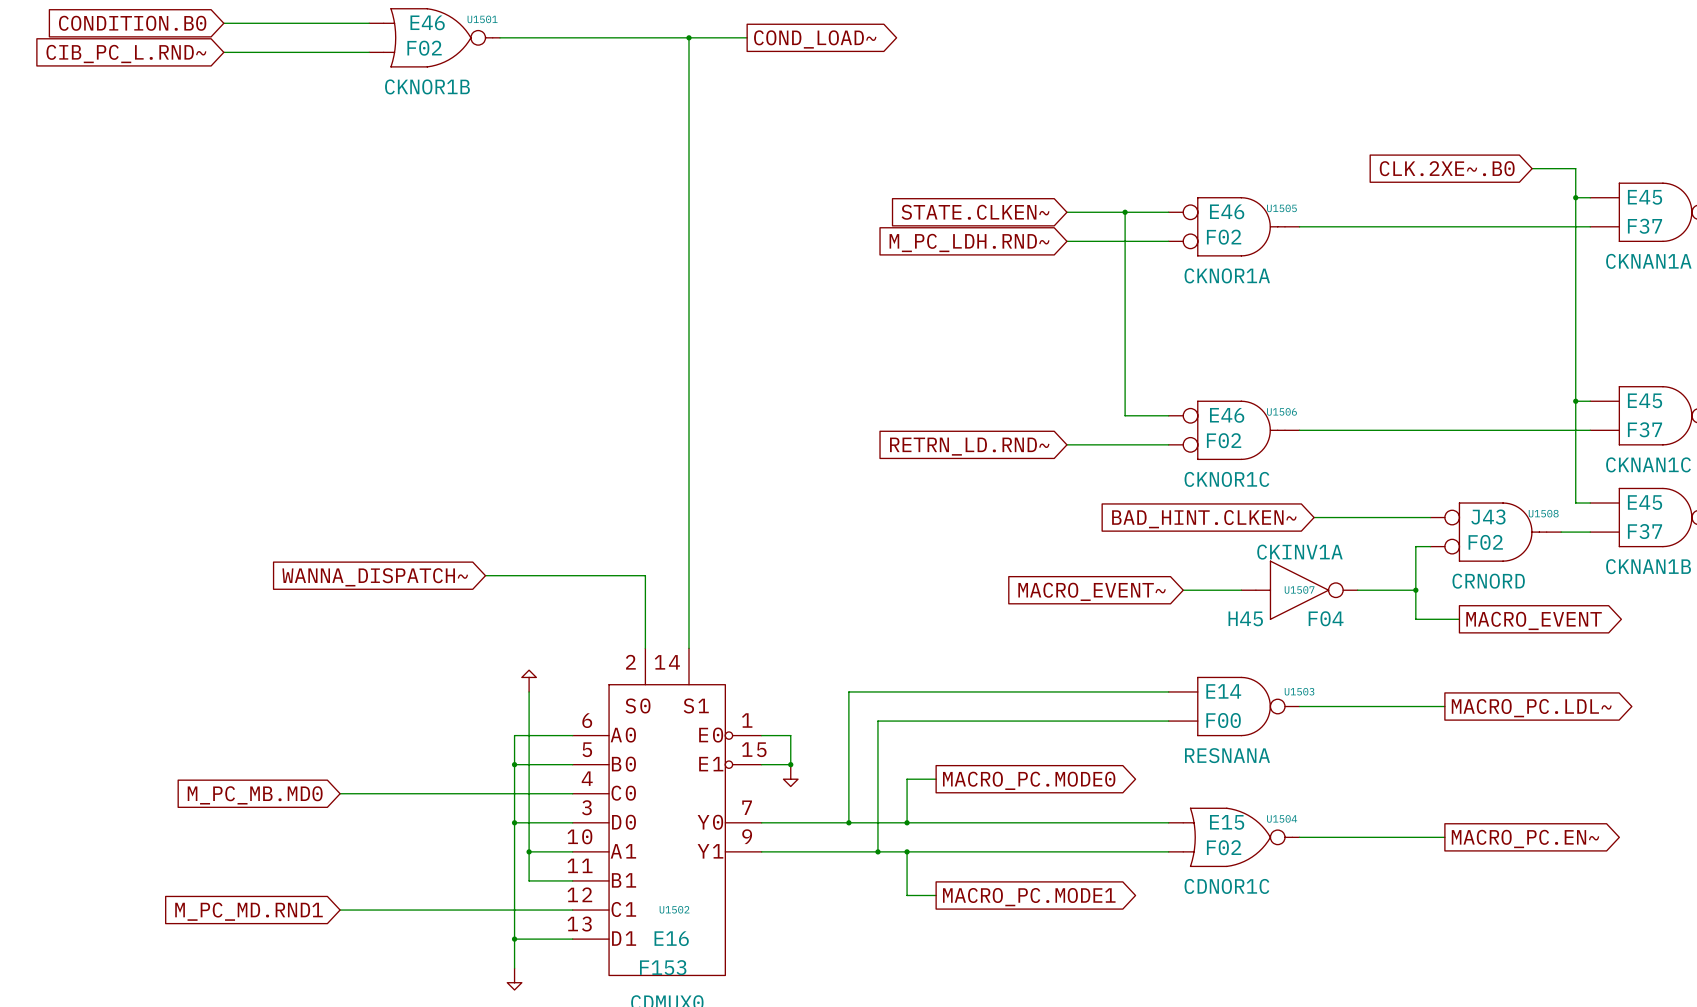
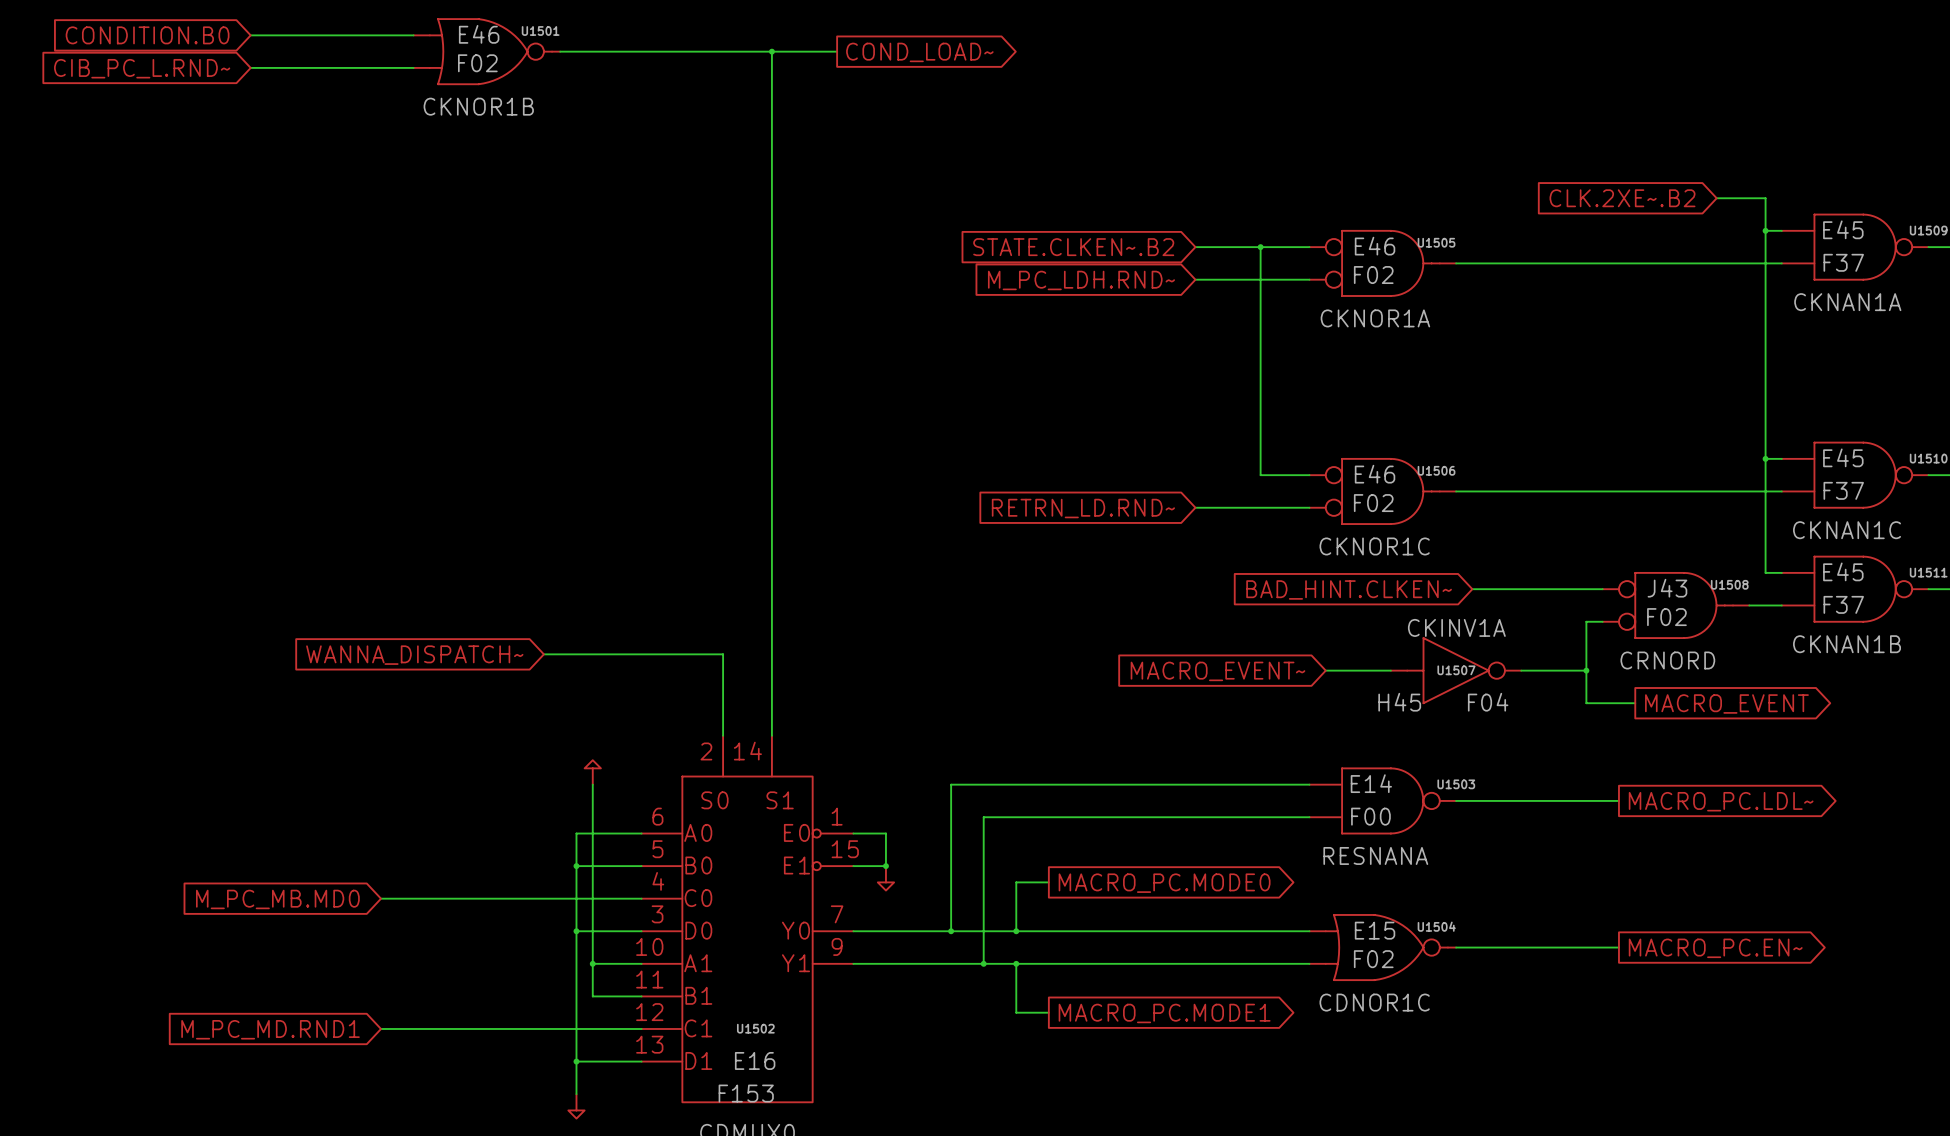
global label: CLK.2XE~.B0 (1447, 168) -> CLK.2XE~.B2 (1622, 198)
global label: STATE.CLKEN~ (975, 212) -> STATE.CLKEN~.B2 (1073, 247)

